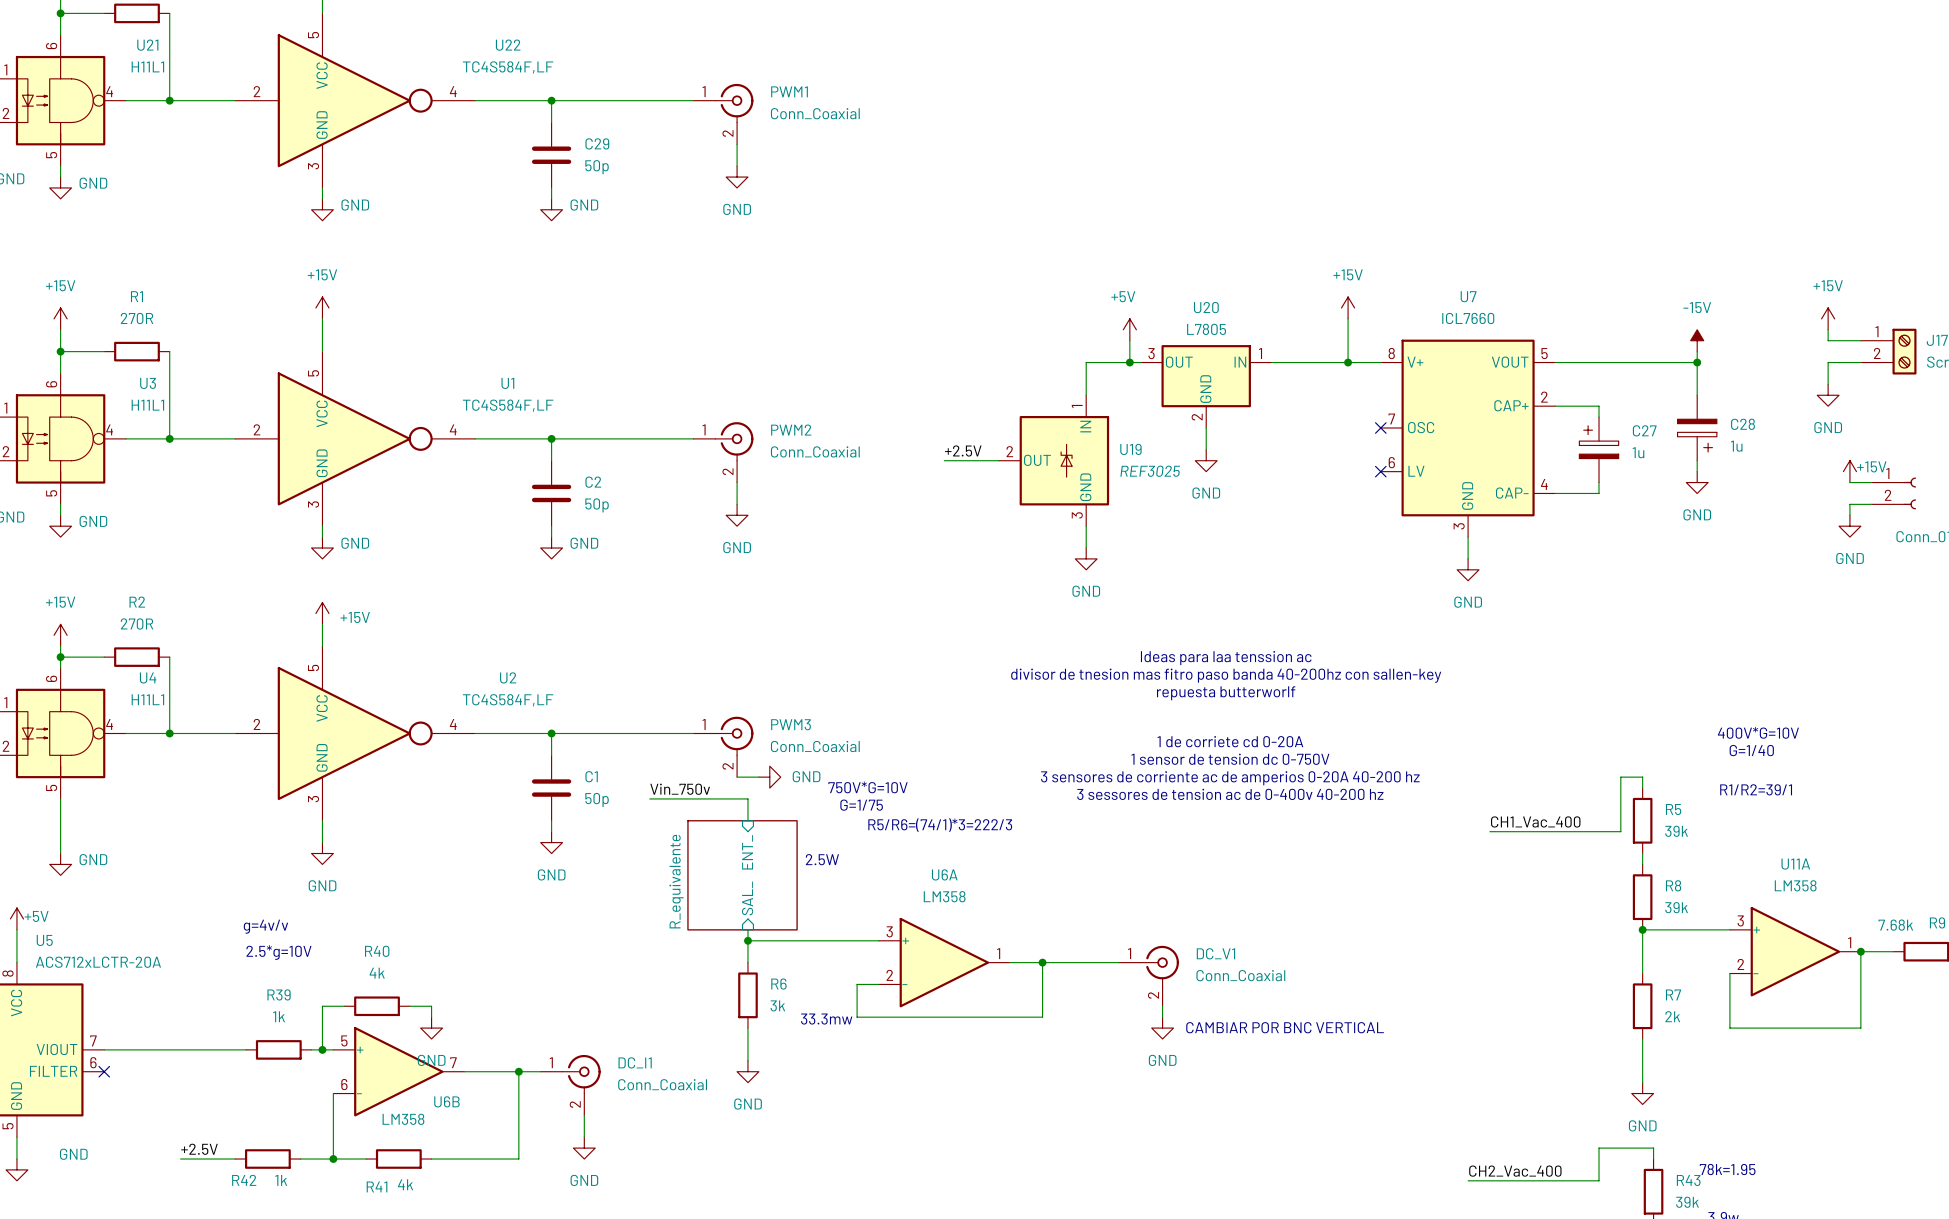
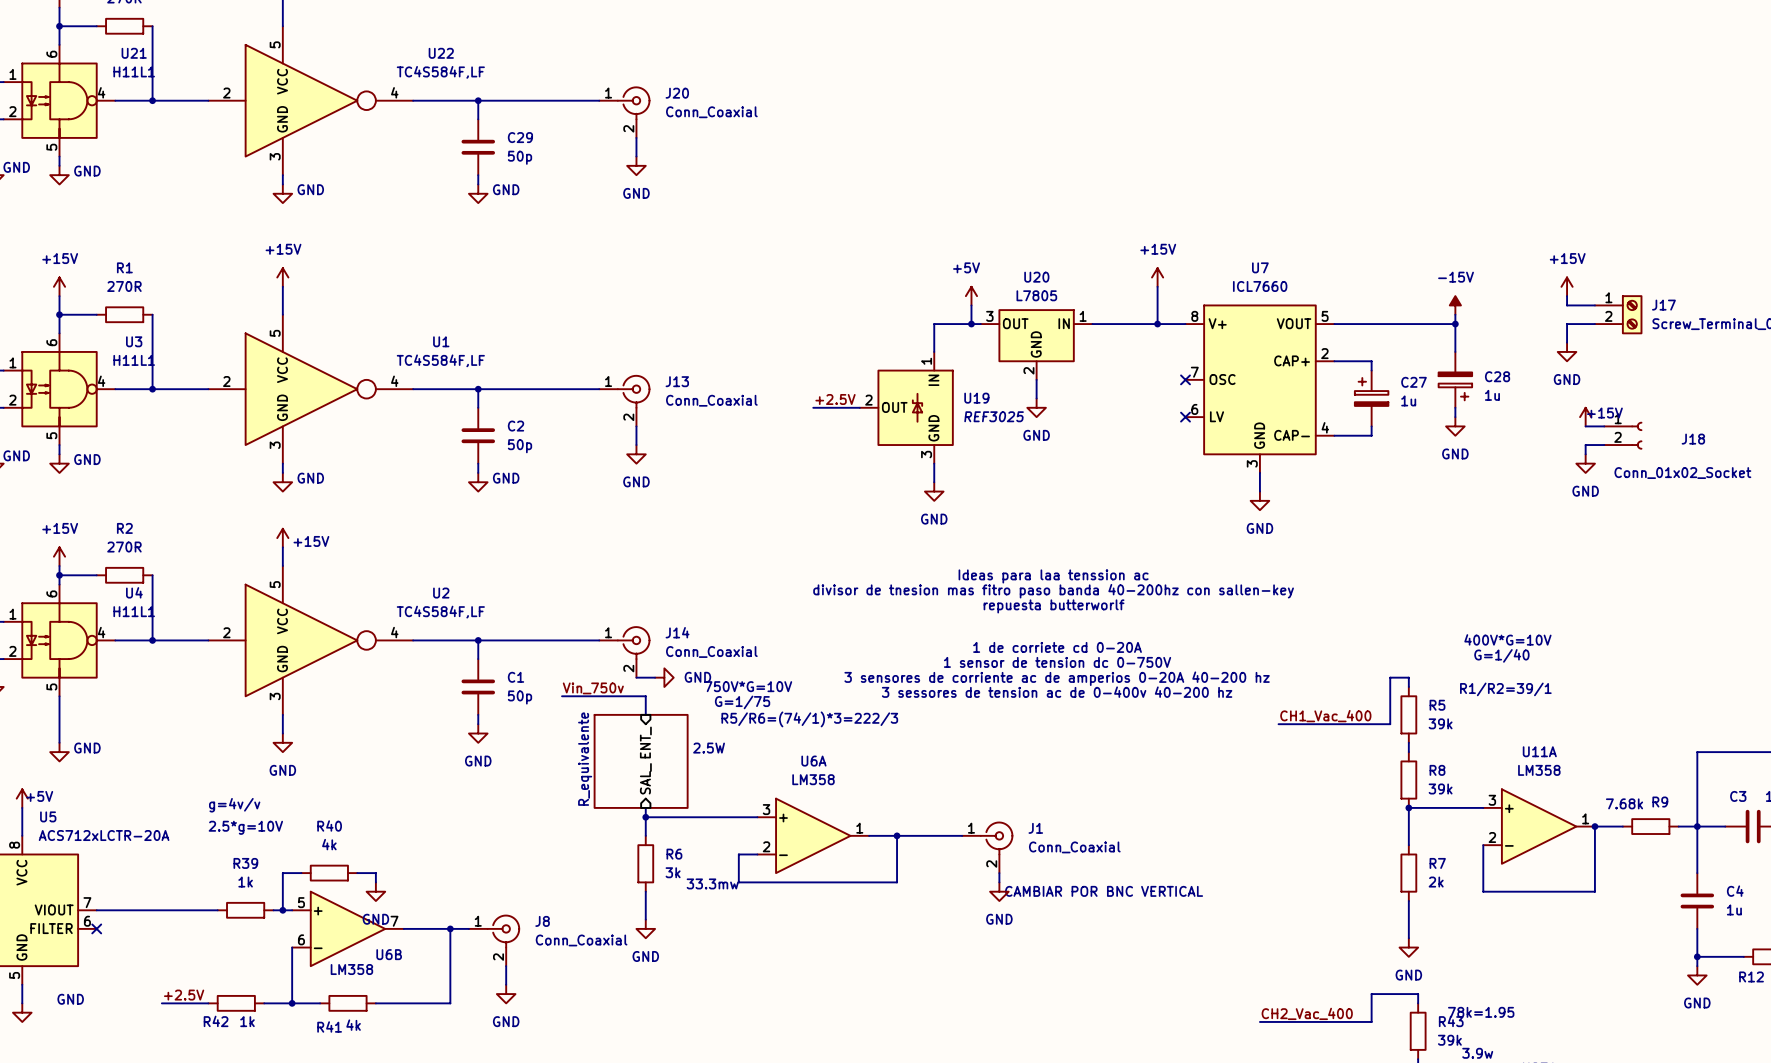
PWM1 name: PWM1 (789, 91) -> J20 (677, 93)
PWM2 name: PWM2 (791, 430) -> J13 (677, 381)
PWM3 name: PWM3 (791, 724) -> J14 (677, 632)
DC_V1 name: DC_V1 (1215, 953) -> J1 (1035, 828)
DC_I1 name: DC_I1 (635, 1062) -> J8 (542, 921)

